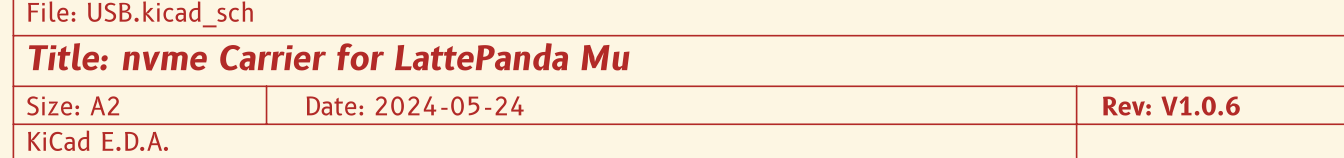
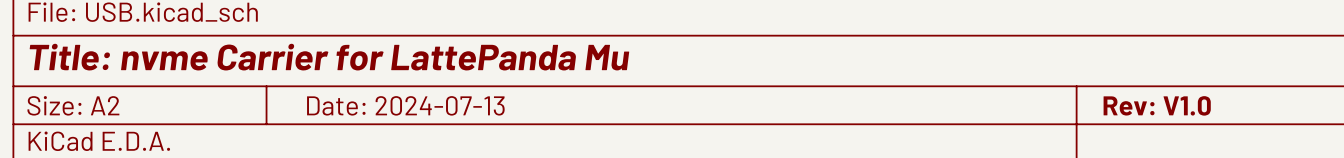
title block: Date: 2024-05-24 (415, 105) -> Date: 2024-07-13 (405, 105)
title block: Rev: V1.0.6 (1171, 106) -> Rev: V1.0 (1157, 105)

